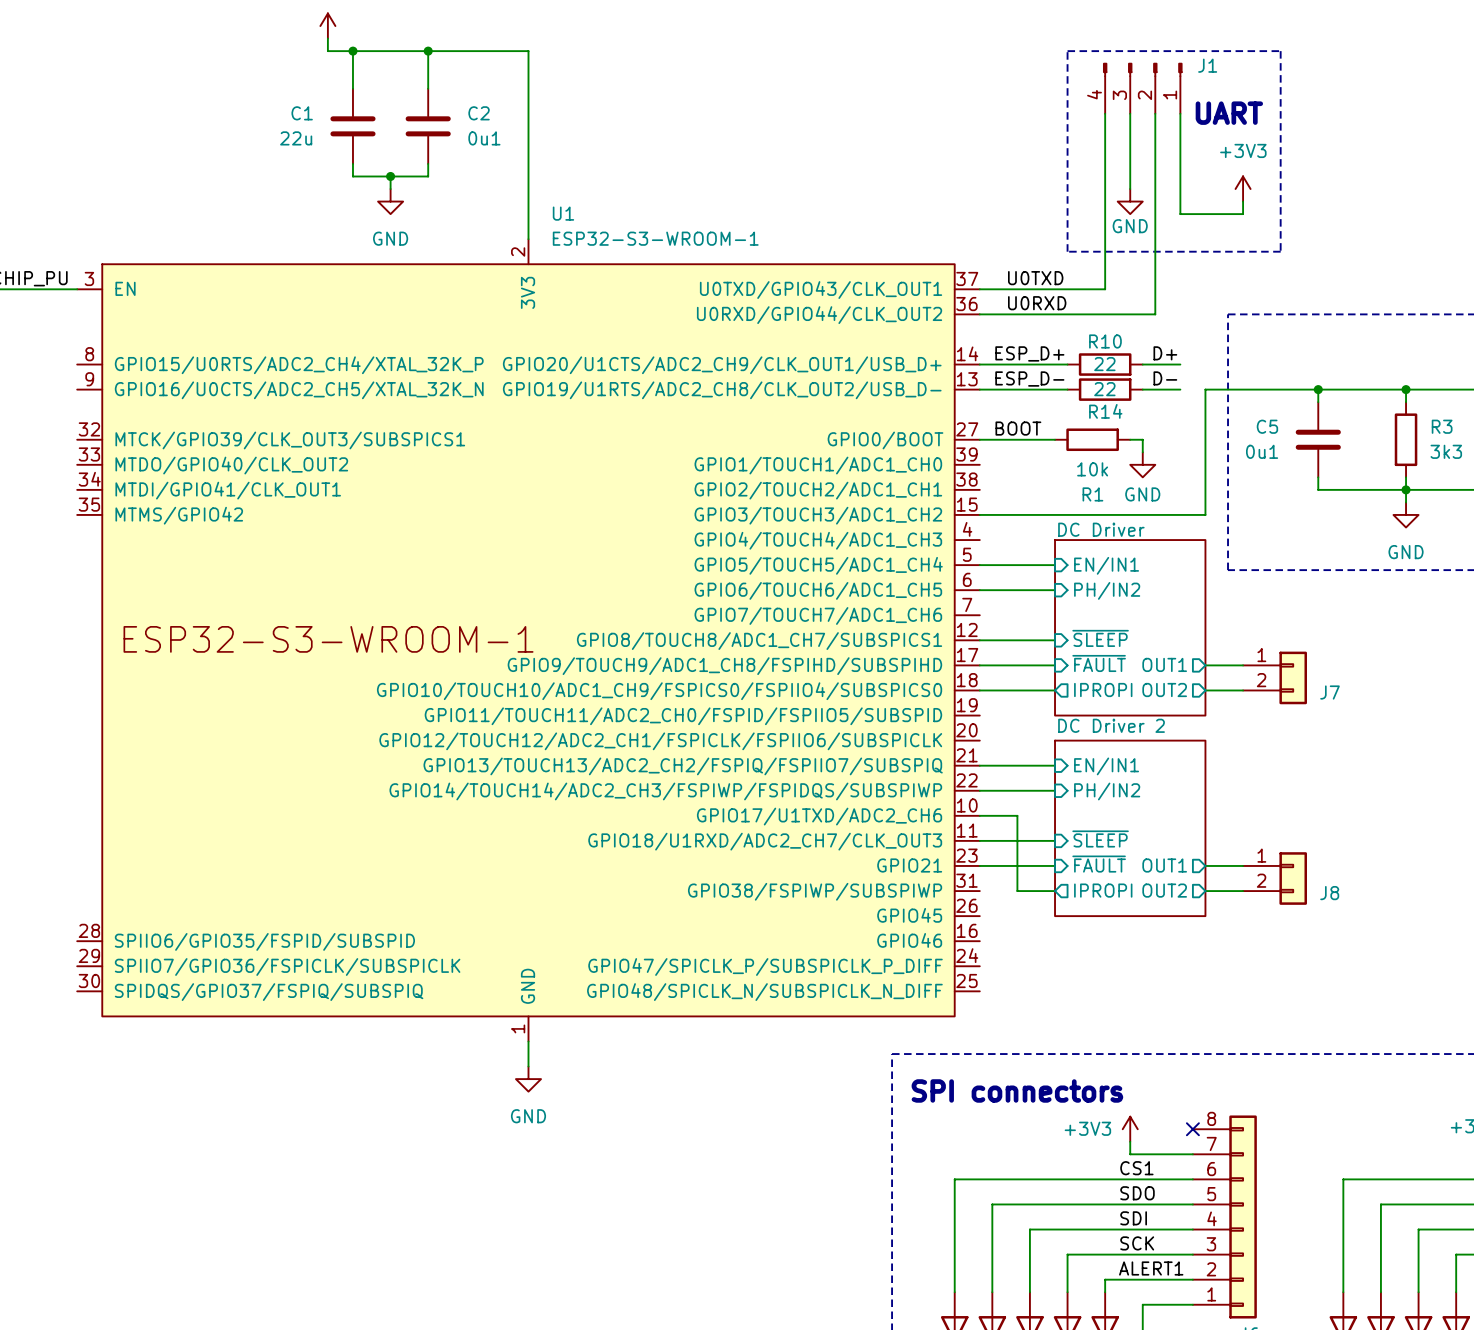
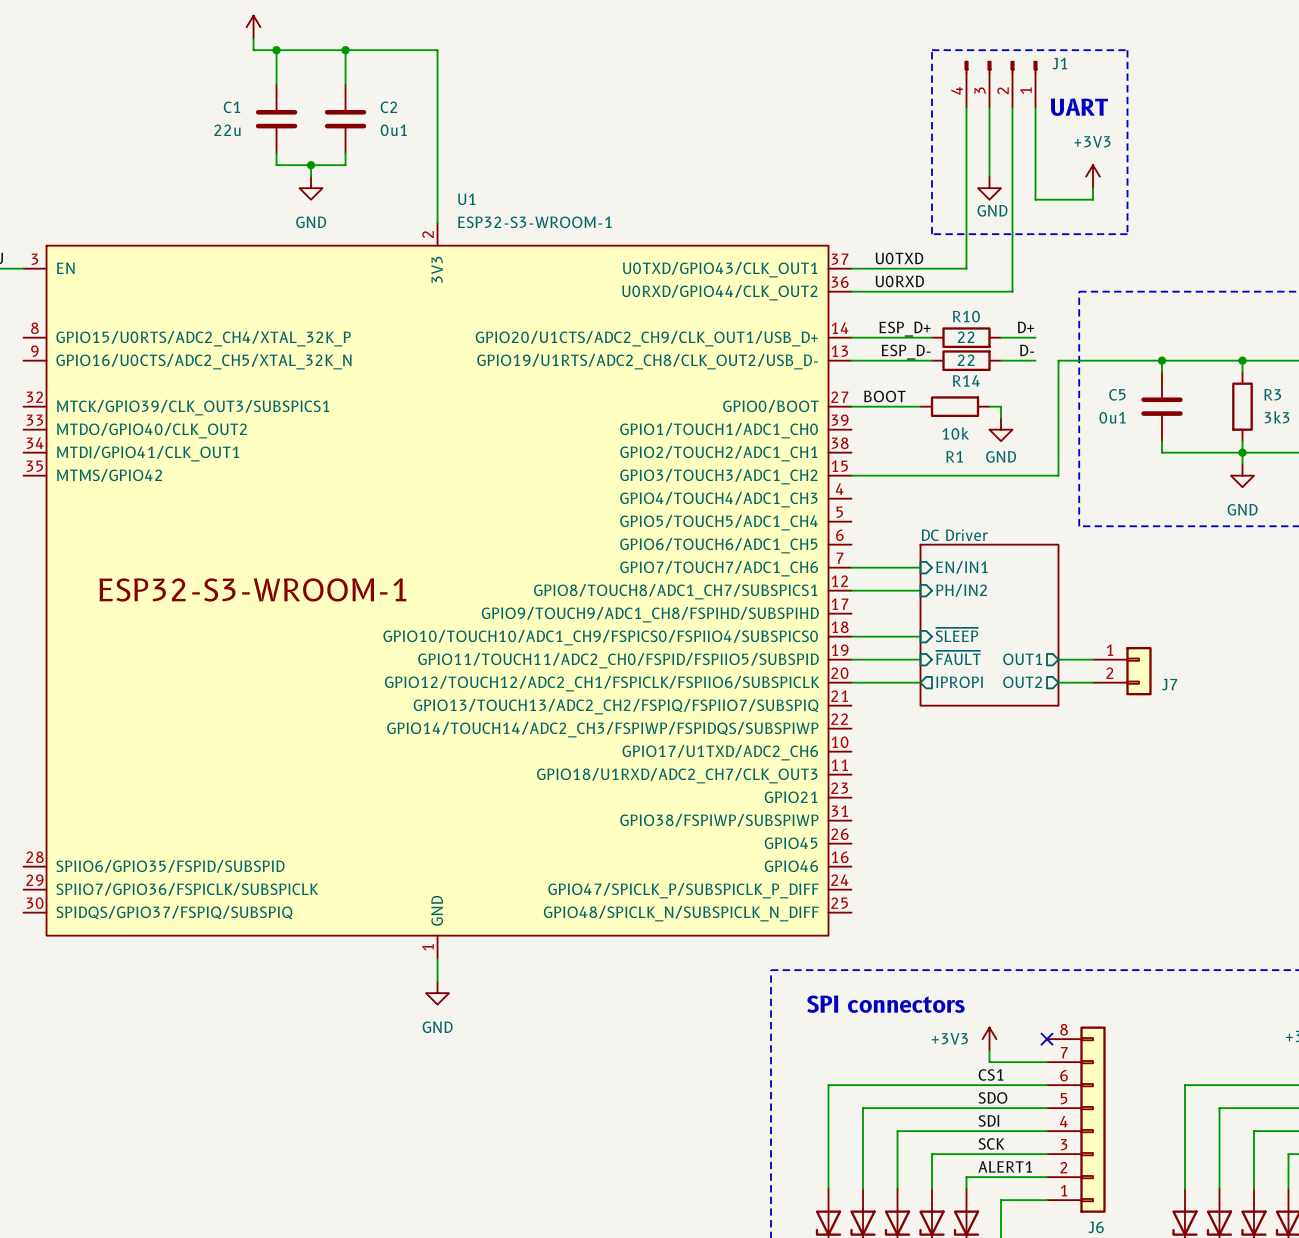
wire: (979, 565) (1055, 565) -> (851, 567) (920, 567)
sheet pin position: EN/IN1 (1106, 565) -> EN/IN1 (962, 567)
wire: (979, 590) (1055, 590) -> none
sheet pin: PH/IN2 (1107, 590) -> none
sheet DC Driver position: (1130, 627) -> (989, 625)
sheet pin: ~{SLEEP} (1100, 638) -> PH/IN2 (961, 590)
sheet pin position: ~{FAULT} (1099, 663) -> ~{FAULT} (958, 657)
sheet pin position: OUT1 (1164, 664) -> OUT1 (1022, 659)
wire: (979, 665) (1055, 665) -> (851, 659) (920, 659)
wire: (1205, 665) (1243, 665) -> (1058, 659) (1093, 659)
J7 position: (1275, 677) -> (1122, 671)
sheet pin shape: output (1103, 690) -> input (956, 634)
sheet pin: IPROPI (1103, 690) -> ~{SLEEP} (956, 634)
sheet pin position: OUT2 (1164, 690) -> OUT2 (1022, 682)
wire: (1205, 690) (1243, 690) -> (1058, 682) (1093, 682)
wire: (979, 765) (1055, 765) -> none
sheet pin: EN/IN1 (1106, 766) -> none
wire: (979, 790) (1055, 790) -> (851, 682) (920, 682)
sheet pin: PH/IN2 (1107, 791) -> none
wire: (979, 815) (1017, 815) (1017, 891) (1055, 891) -> none
sheet DC Driver 2: (1130, 828) -> none
sheet pin: ~{SLEEP} (1100, 838) -> none
wire: (979, 840) (1055, 840) -> none
sheet pin: ~{FAULT} (1099, 864) -> none
wire: (979, 865) (1055, 865) -> none
sheet pin: OUT1 (1164, 865) -> none
wire: (1205, 865) (1243, 865) -> none
J8: (1275, 878) -> none
sheet pin position: IPROPI (1103, 890) -> IPROPI (959, 682)
sheet pin: OUT2 (1164, 890) -> none
wire: (1205, 891) (1243, 891) -> none

